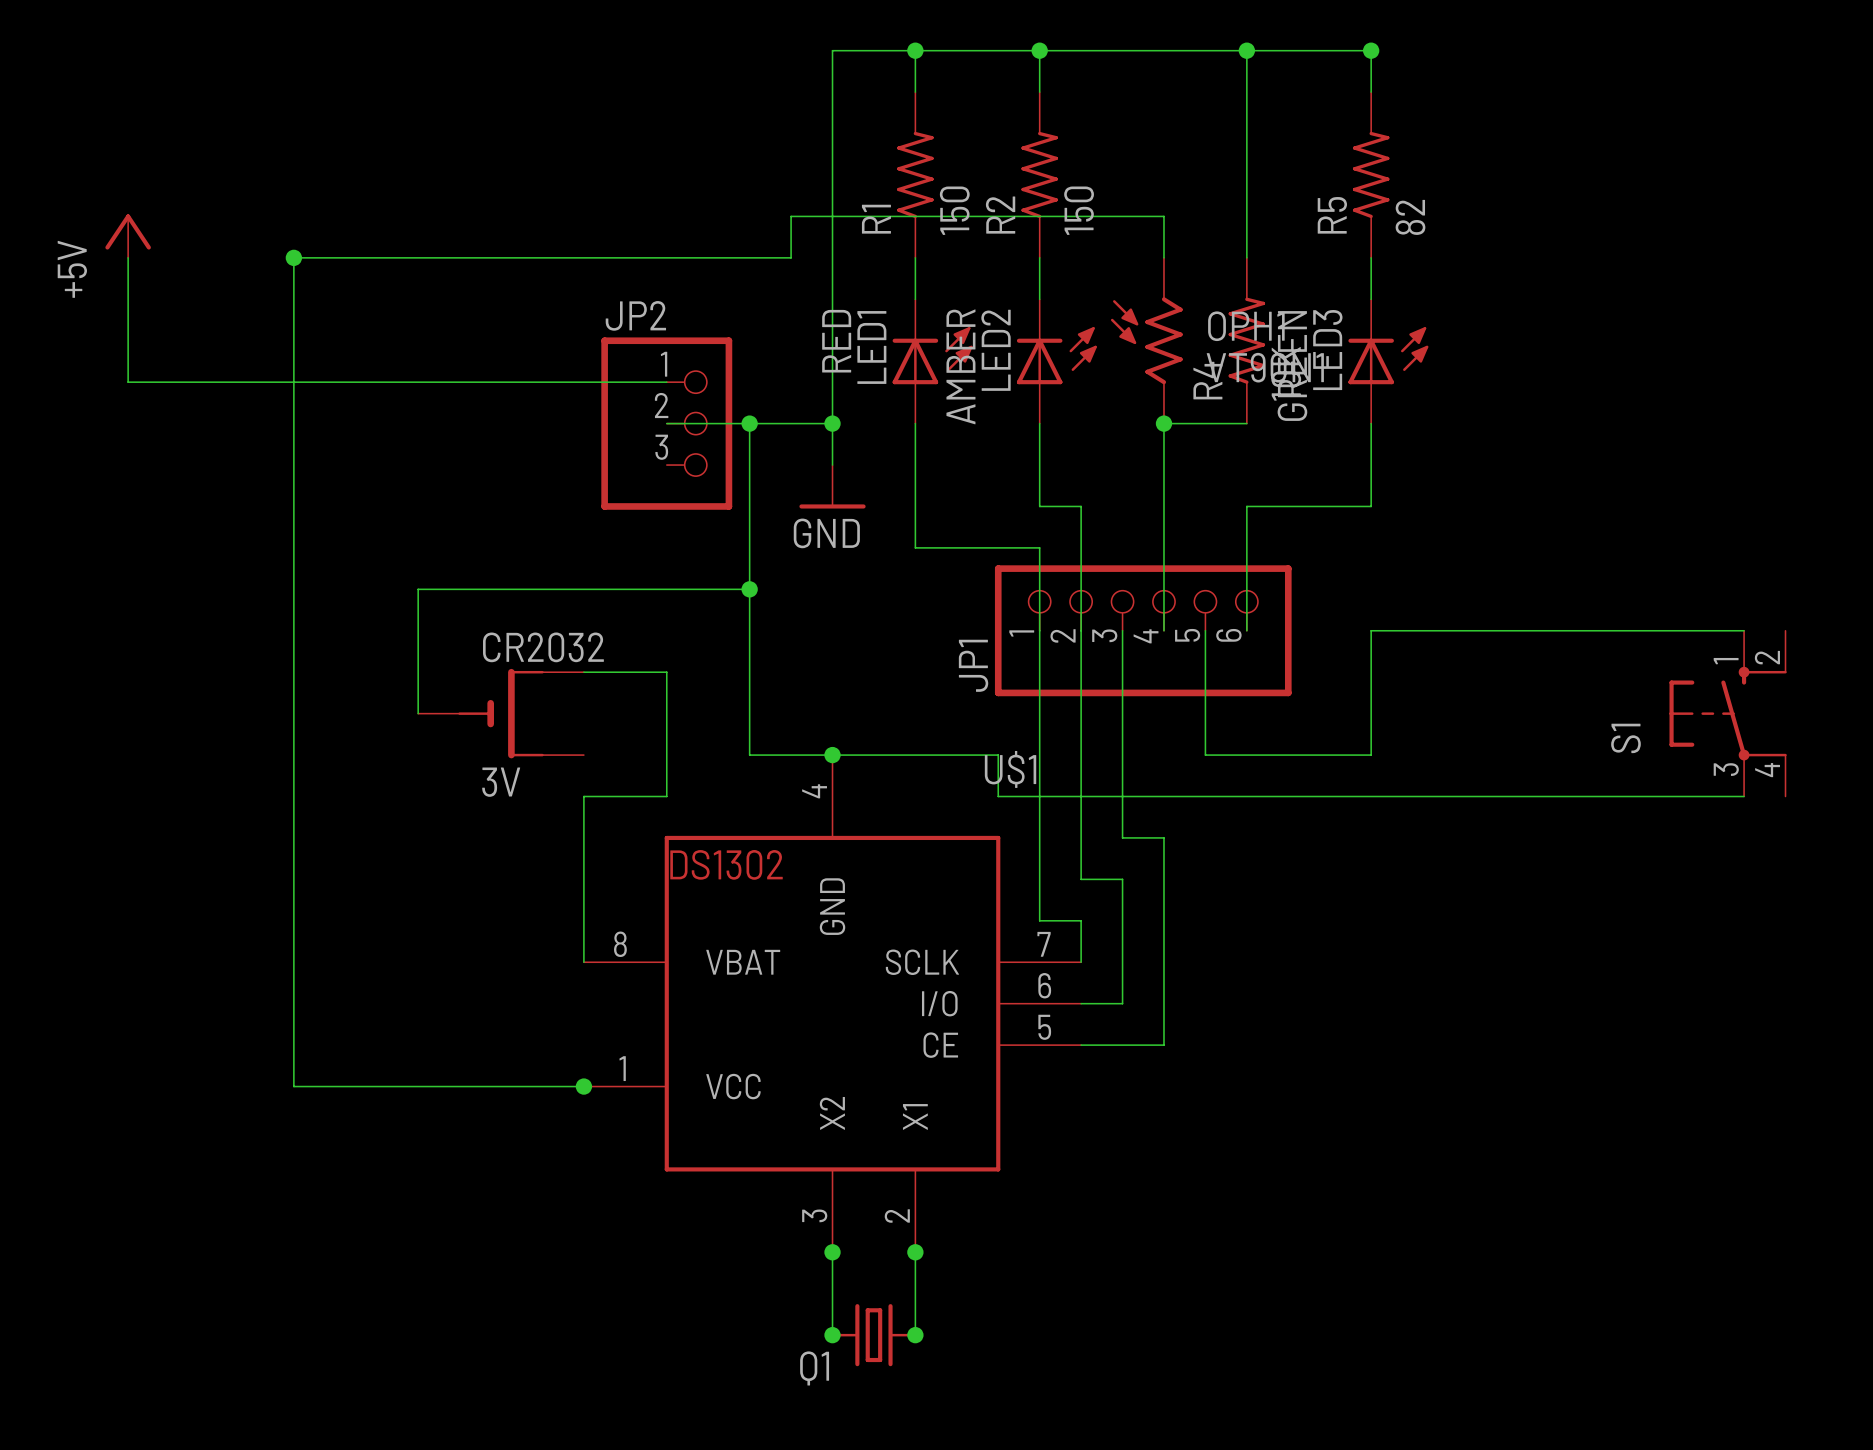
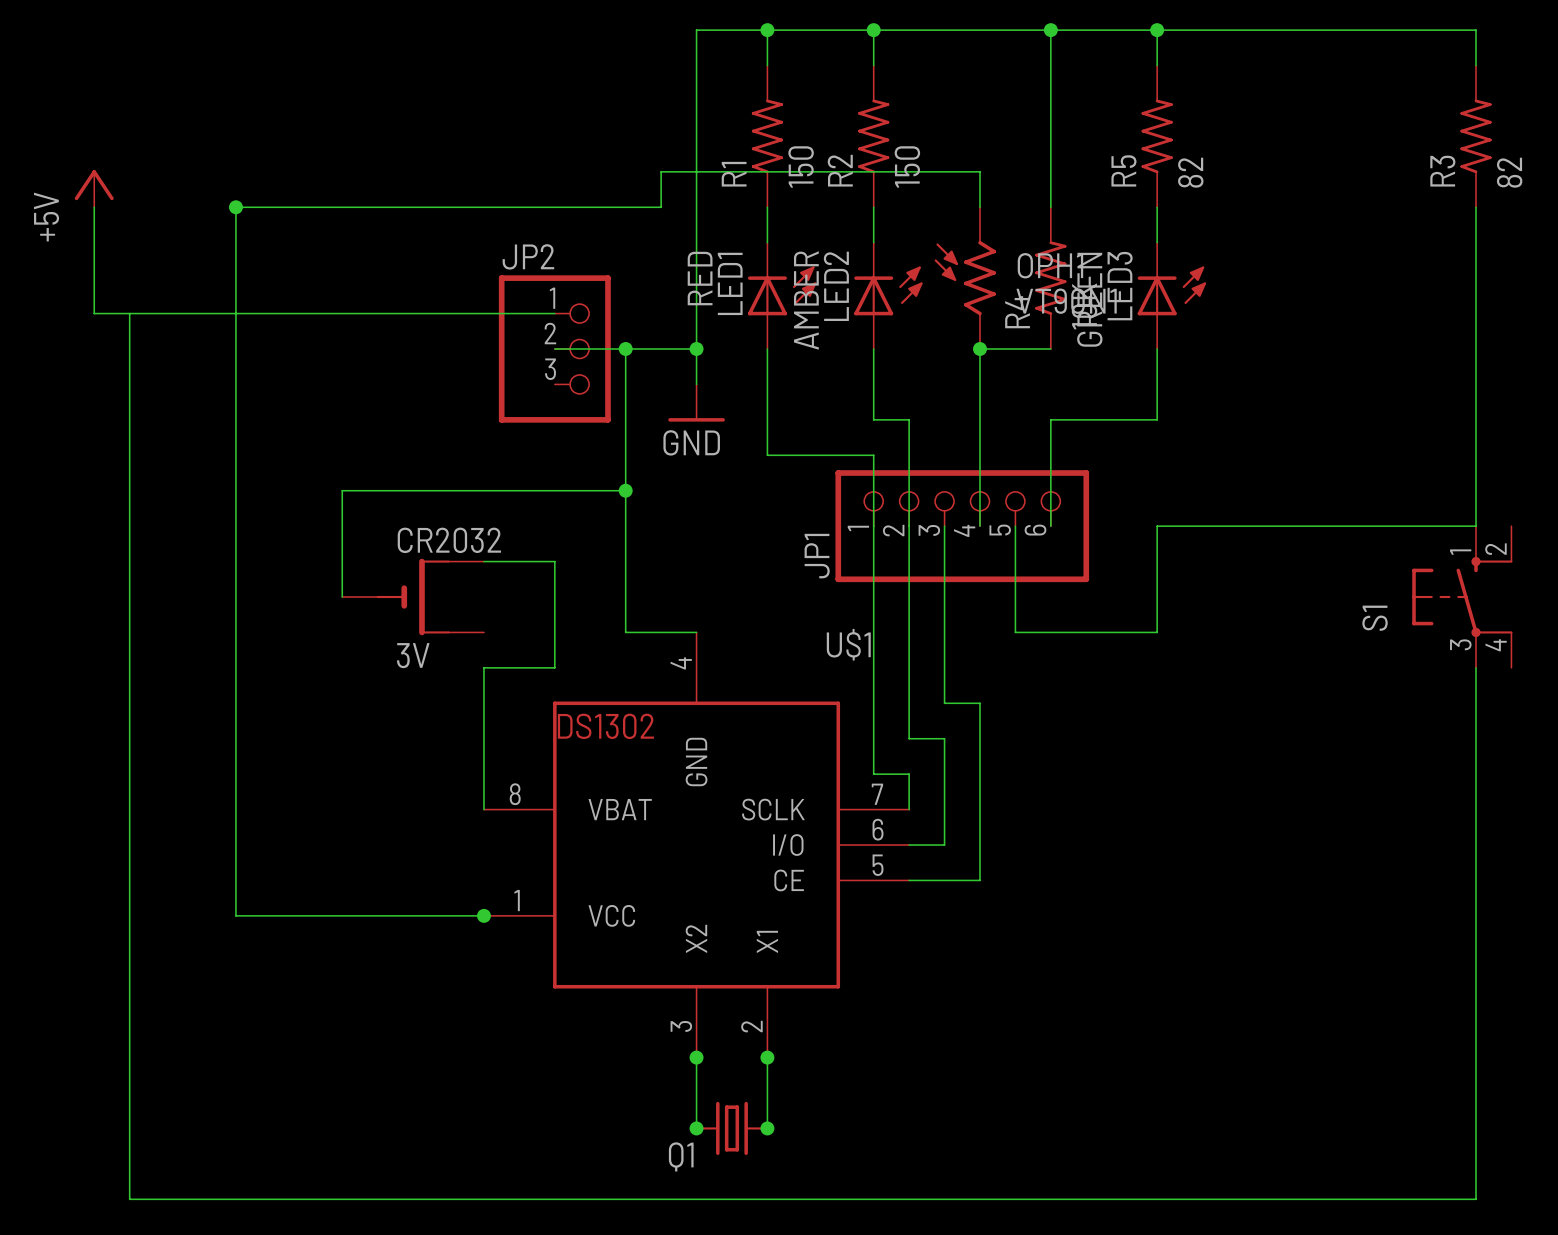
wire: none -> (1157, 30) (1476, 30) (1476, 65)
R3: none -> 82 (1476, 136)
wire: none -> (1476, 207) (1476, 526)
wire: (832, 755) (998, 755) (998, 796) (1744, 796) -> (129, 313) (129, 1199) (1476, 1199) (1476, 667)
junction: (832, 755) -> none

